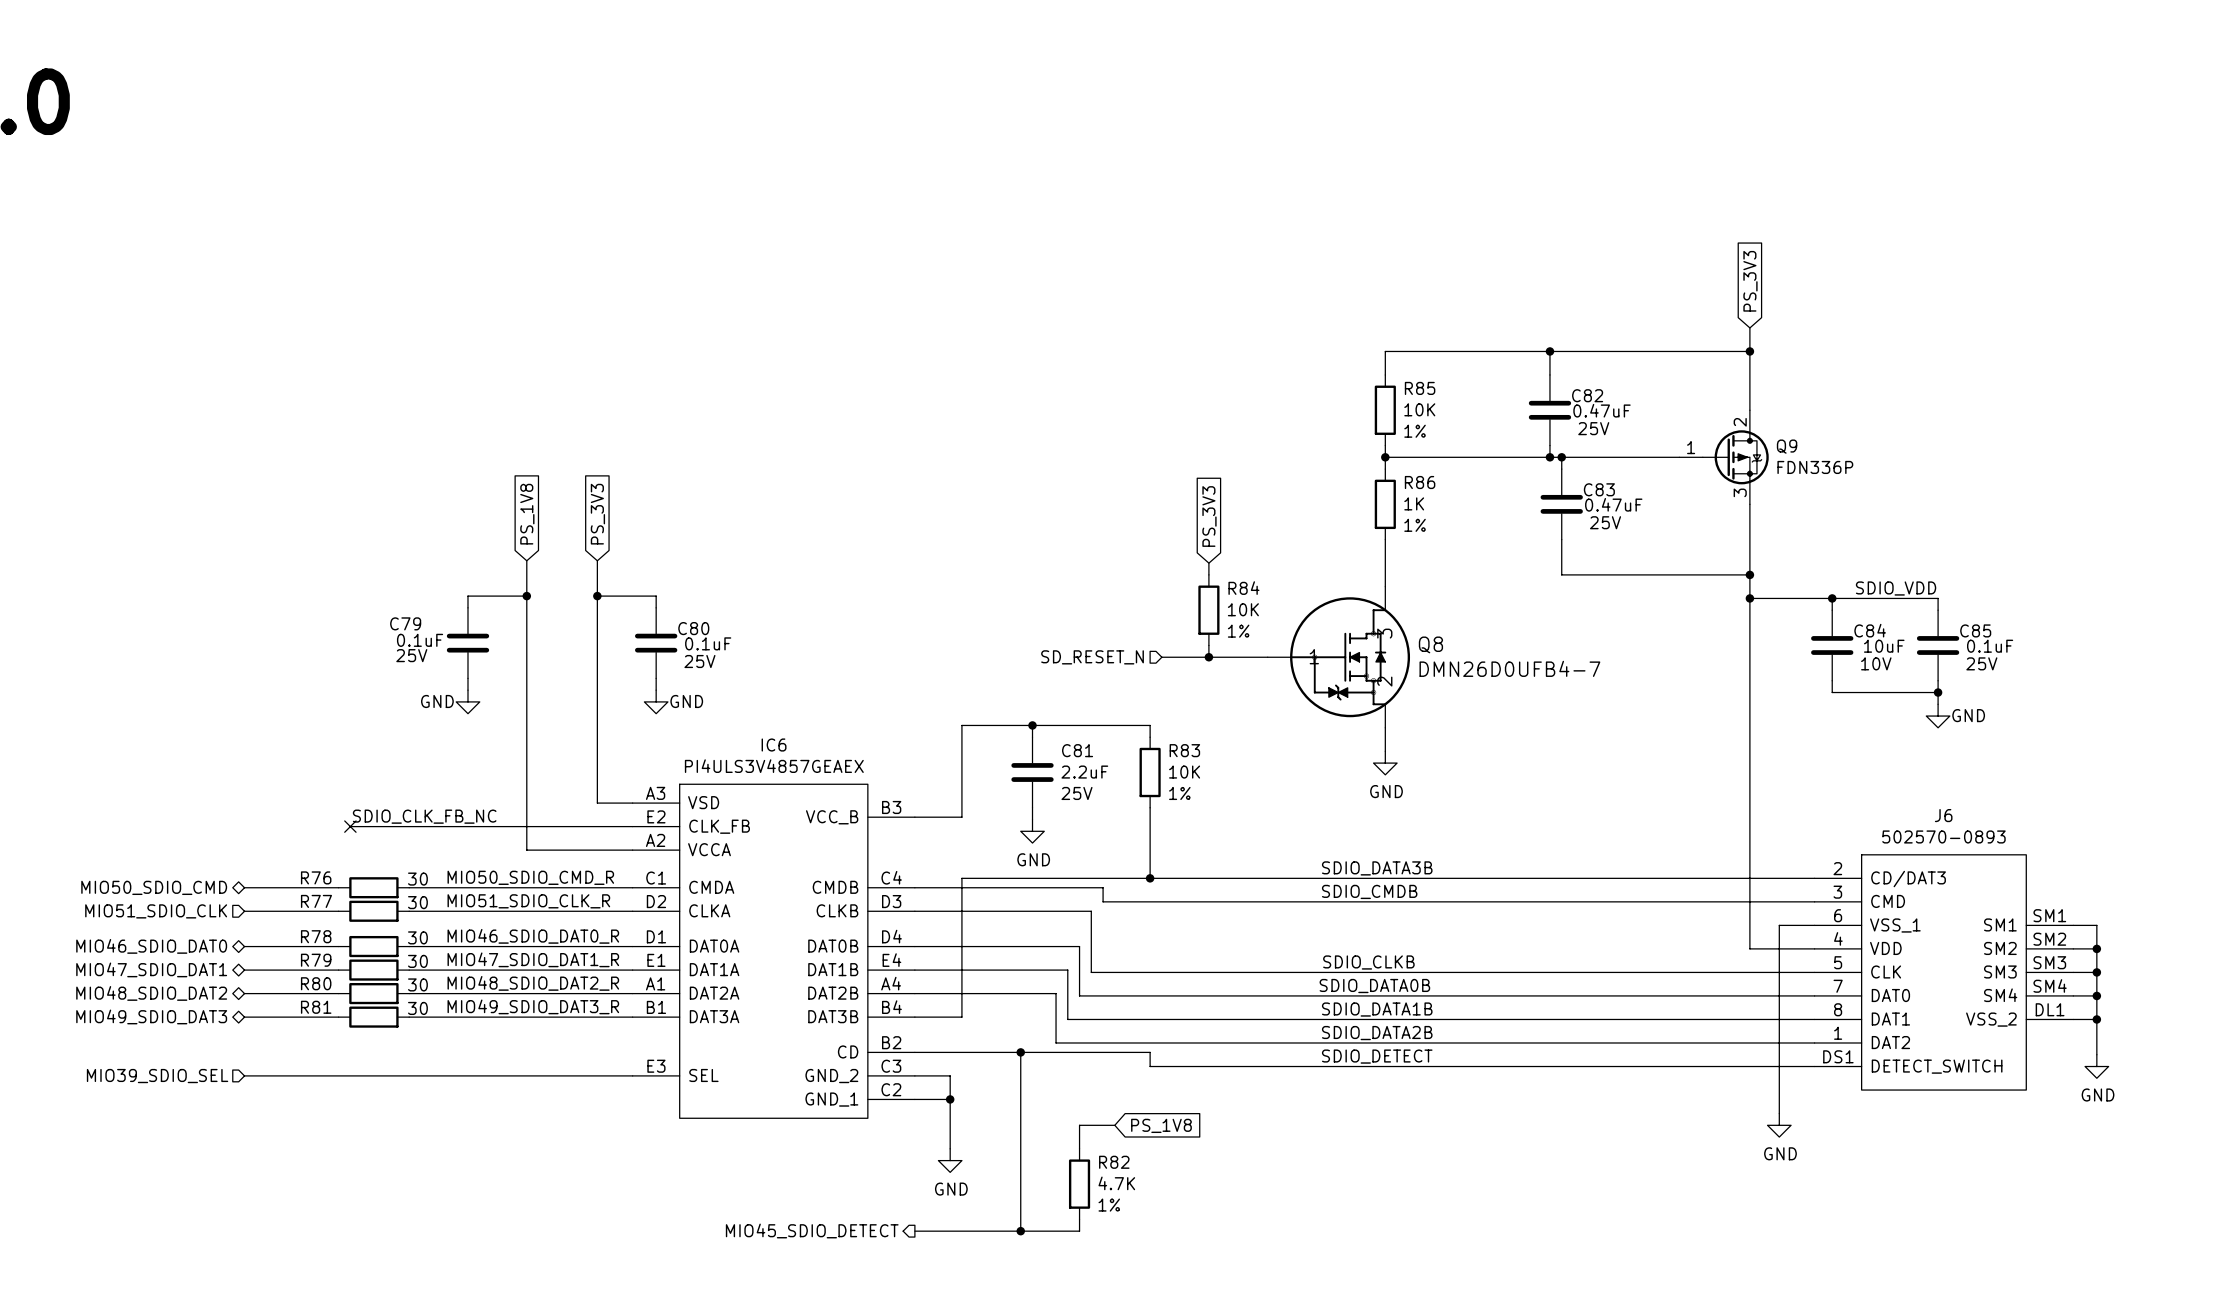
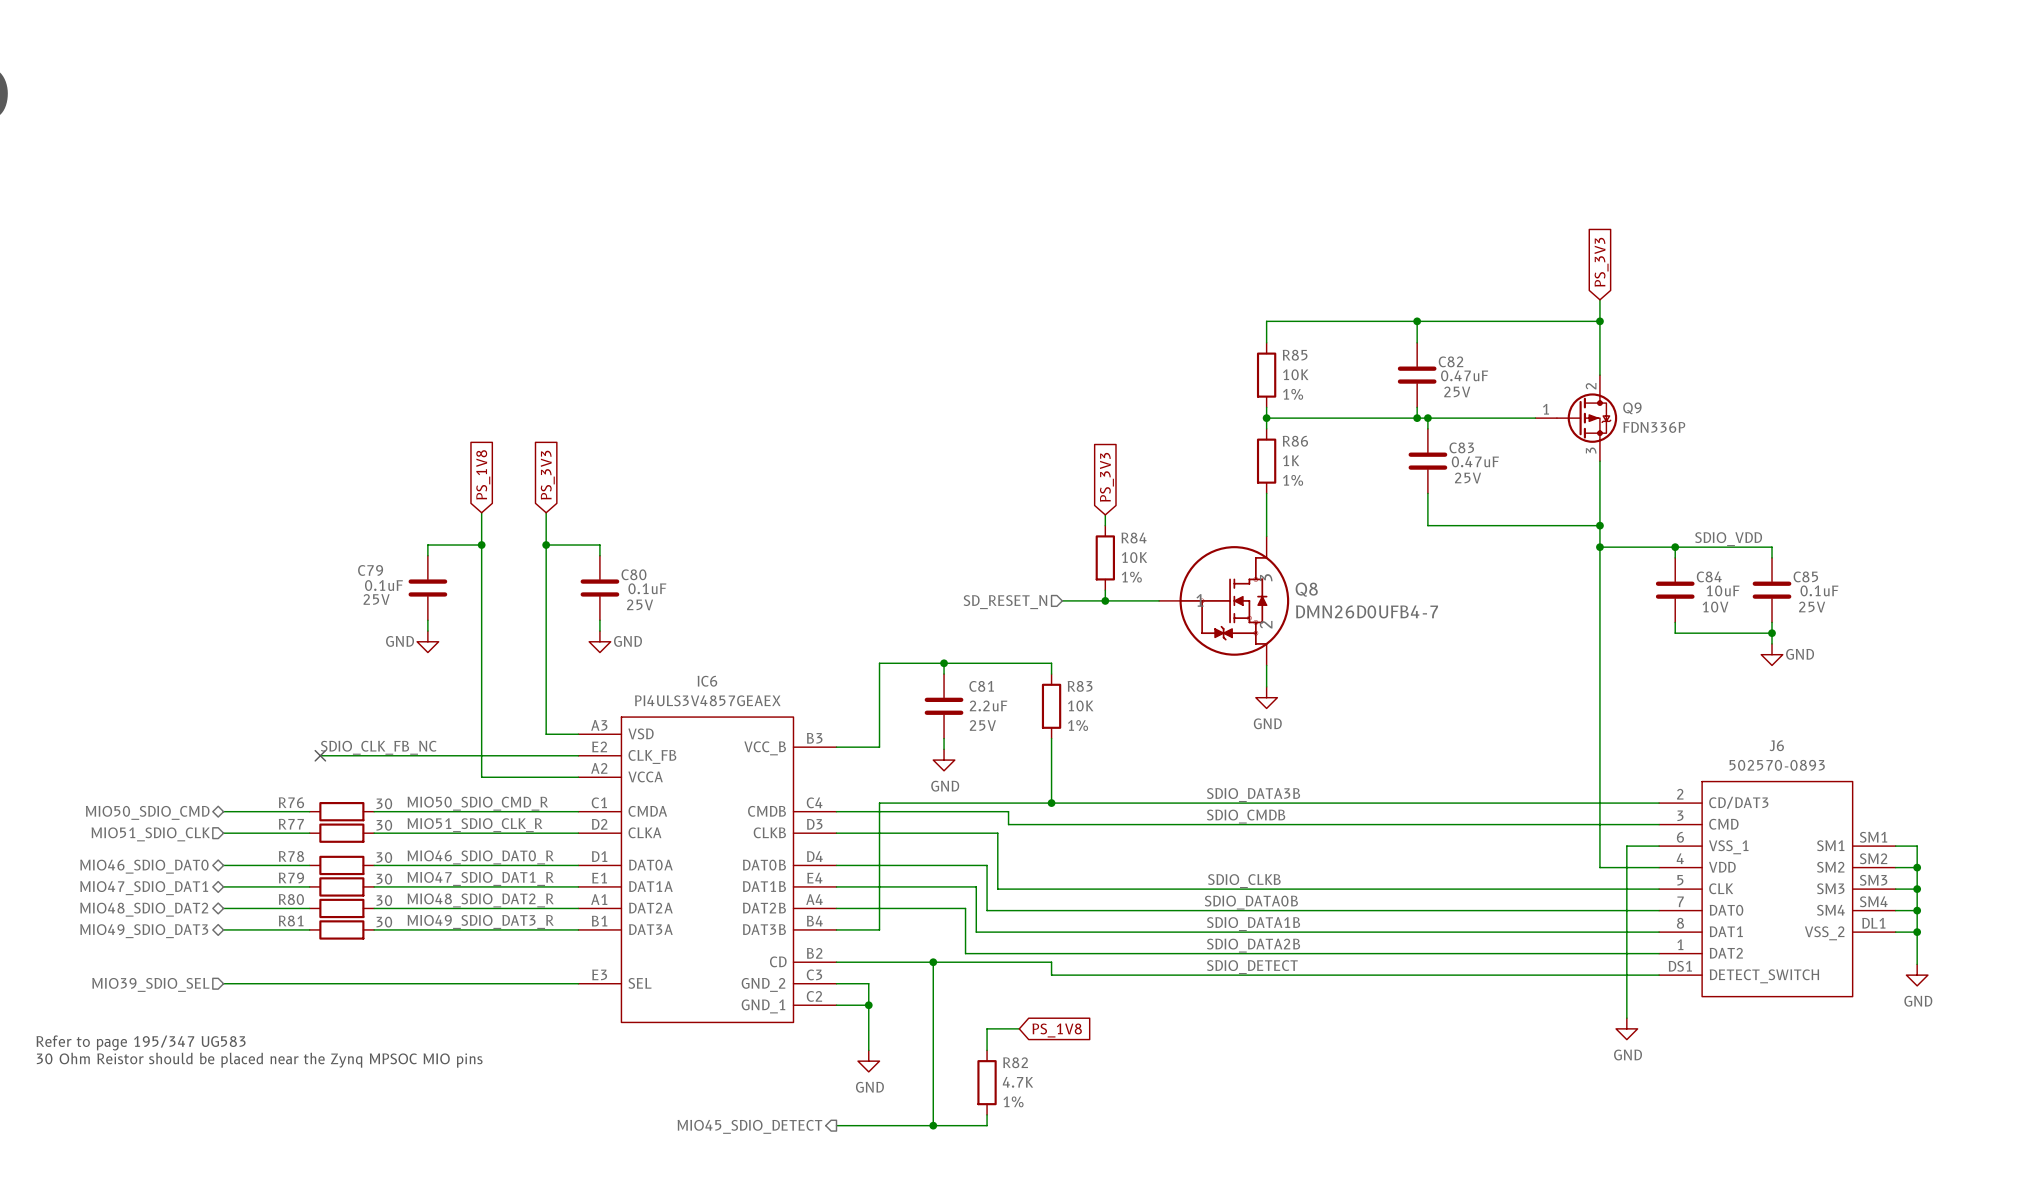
text: none -> Refer to page 195/347 UG583 (141, 1042)
text: none -> 30 Ohm Reistor should be placed near the Zynq MPSOC MIO pins (259, 1060)

